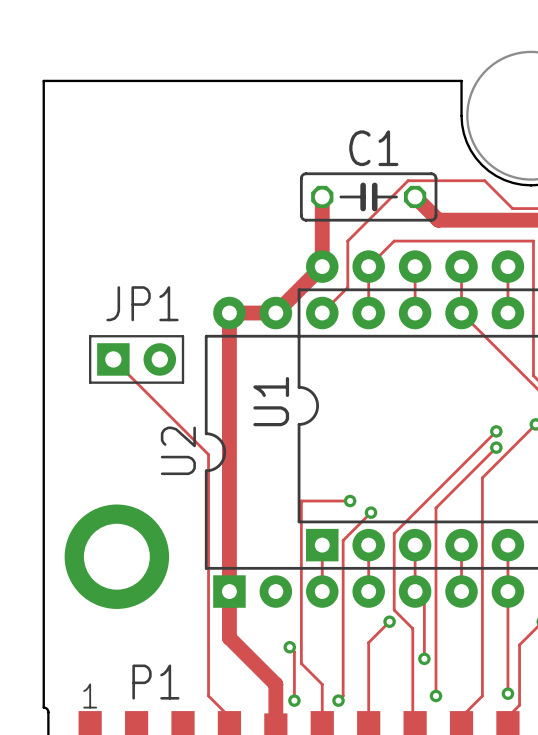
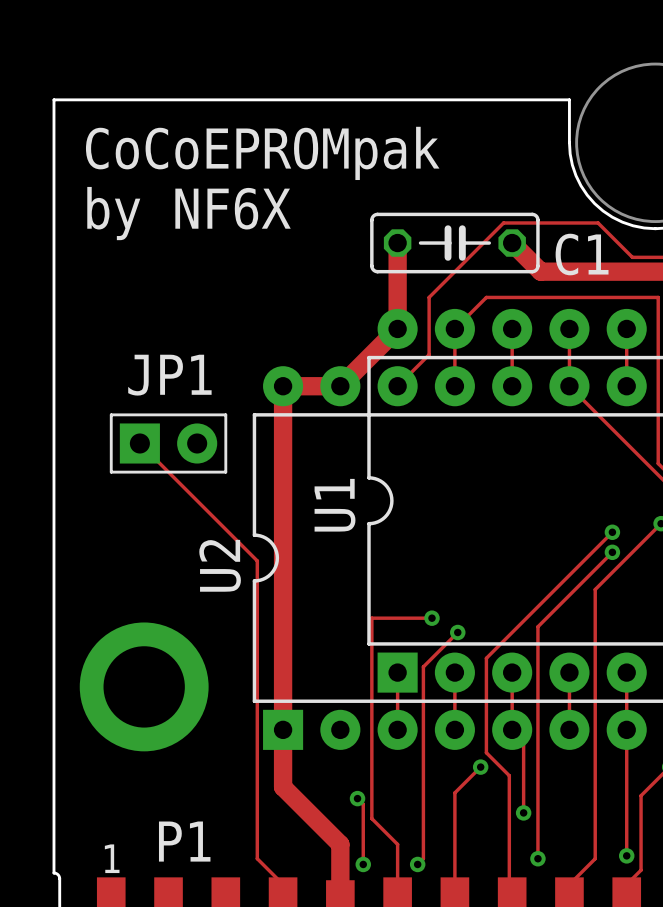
text: none -> CoCoEPROMpak (262, 153)
C1 name position: C1 (373, 148) -> C1 (582, 254)
text: none -> by NF6X (189, 213)

